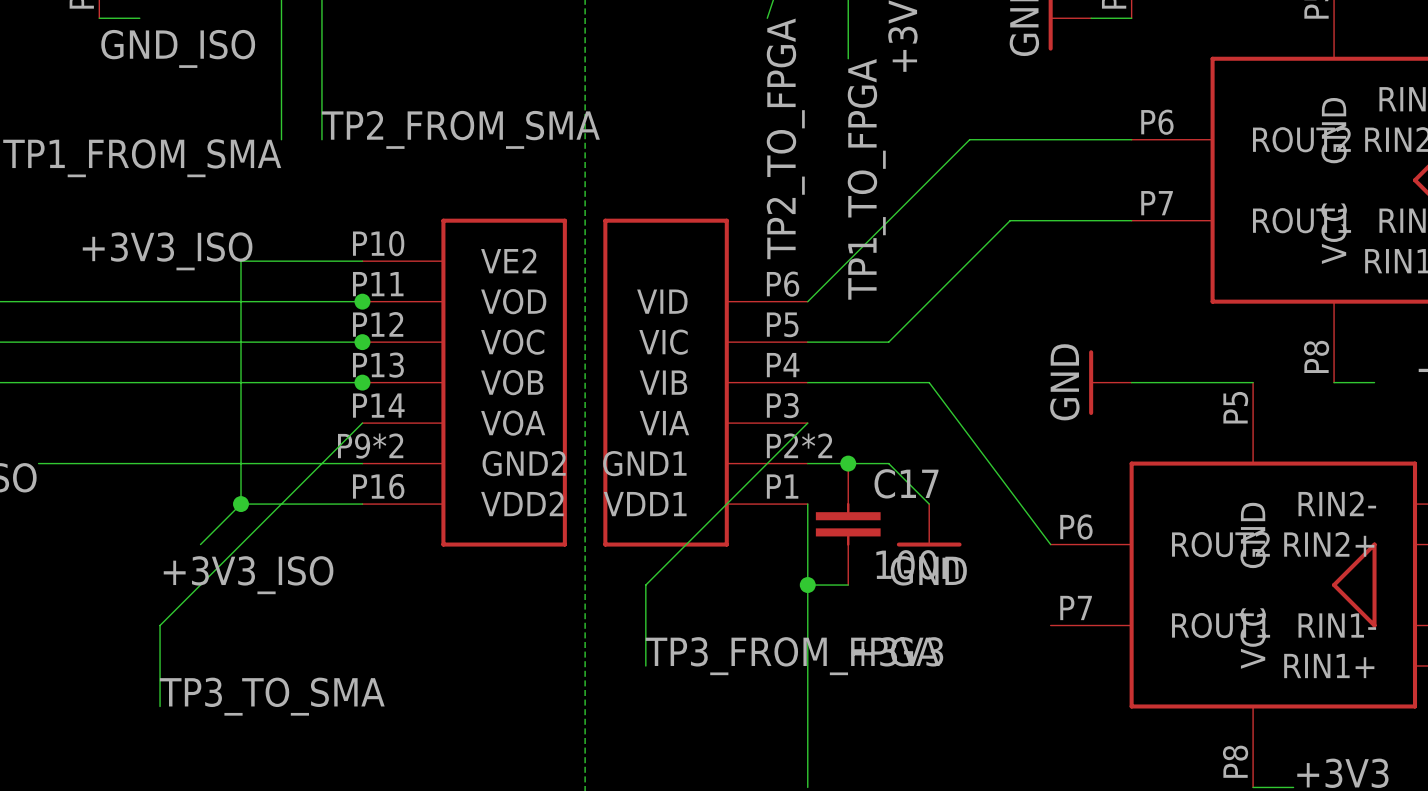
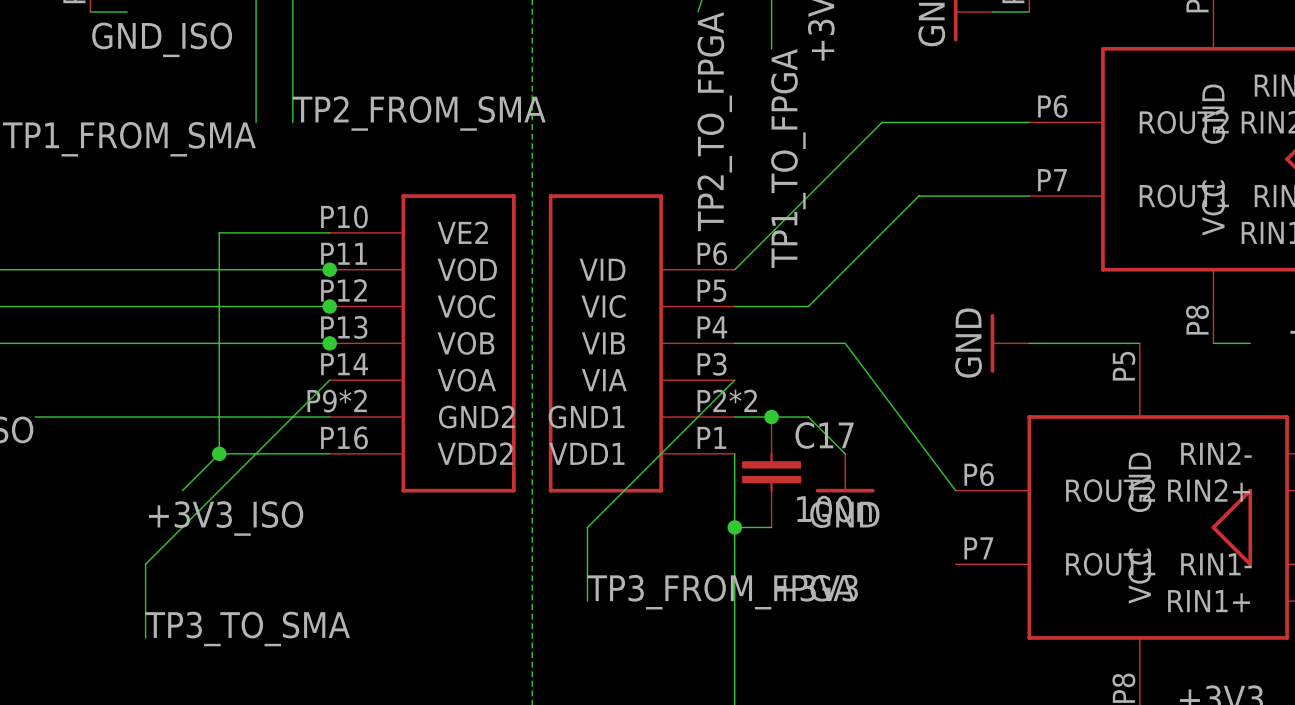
label: +3V3_ISO (167, 251) -> none

